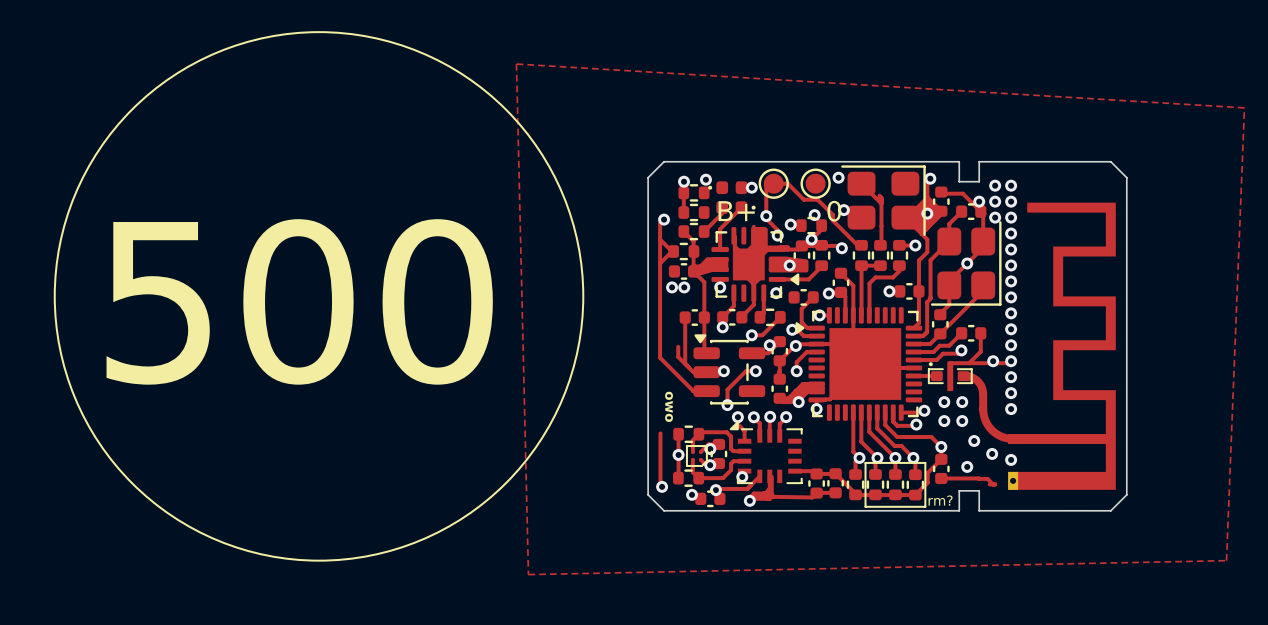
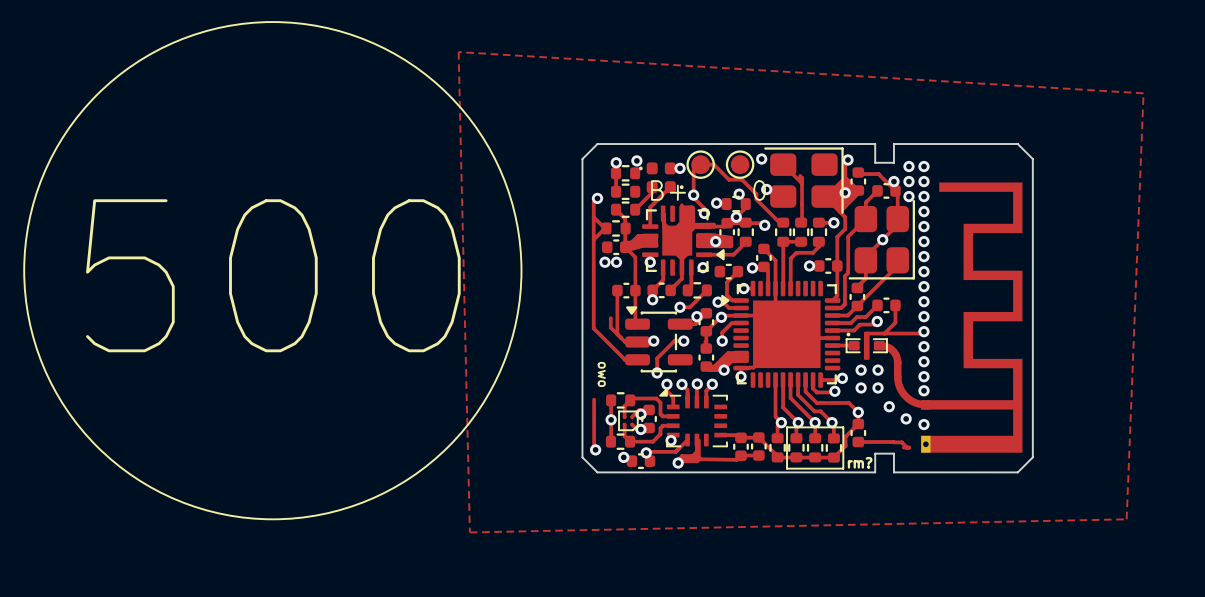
via: (993, 361) -> none
via: none -> (923, 390)
via: (967, 466) -> none

